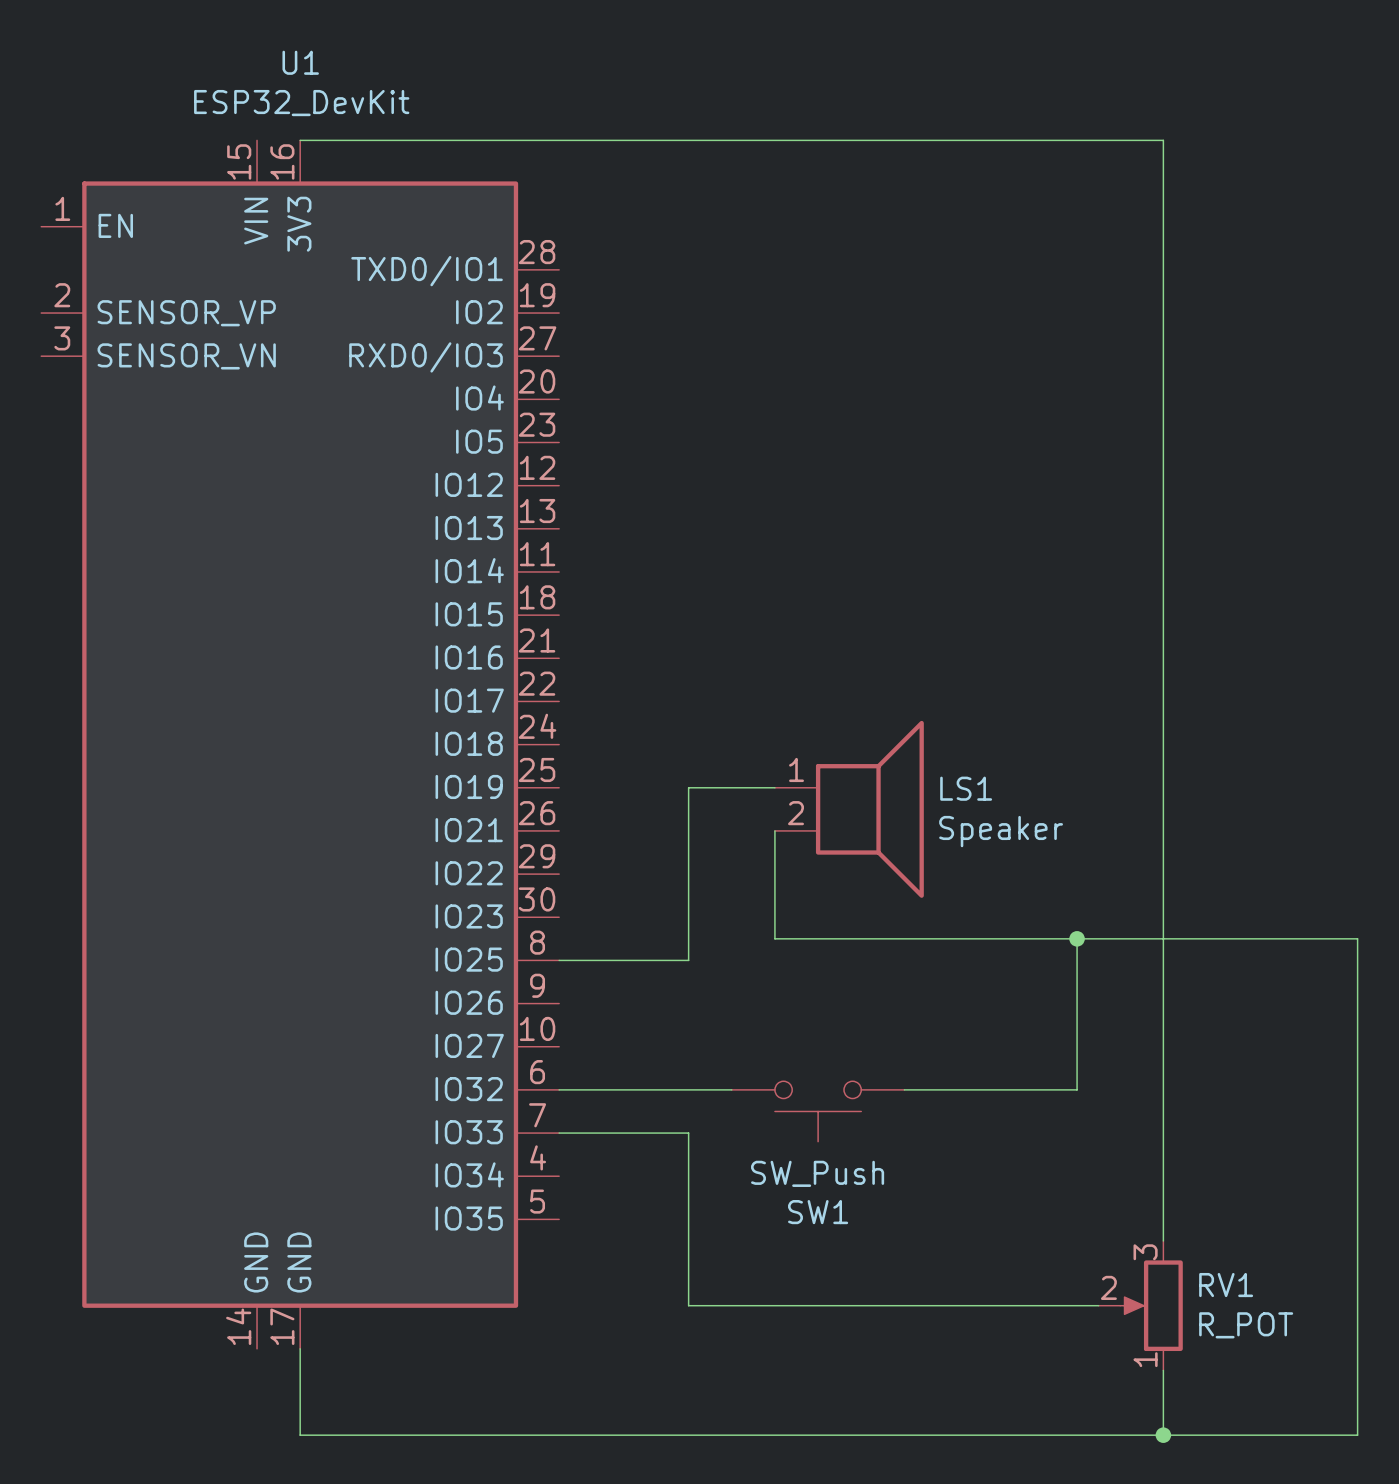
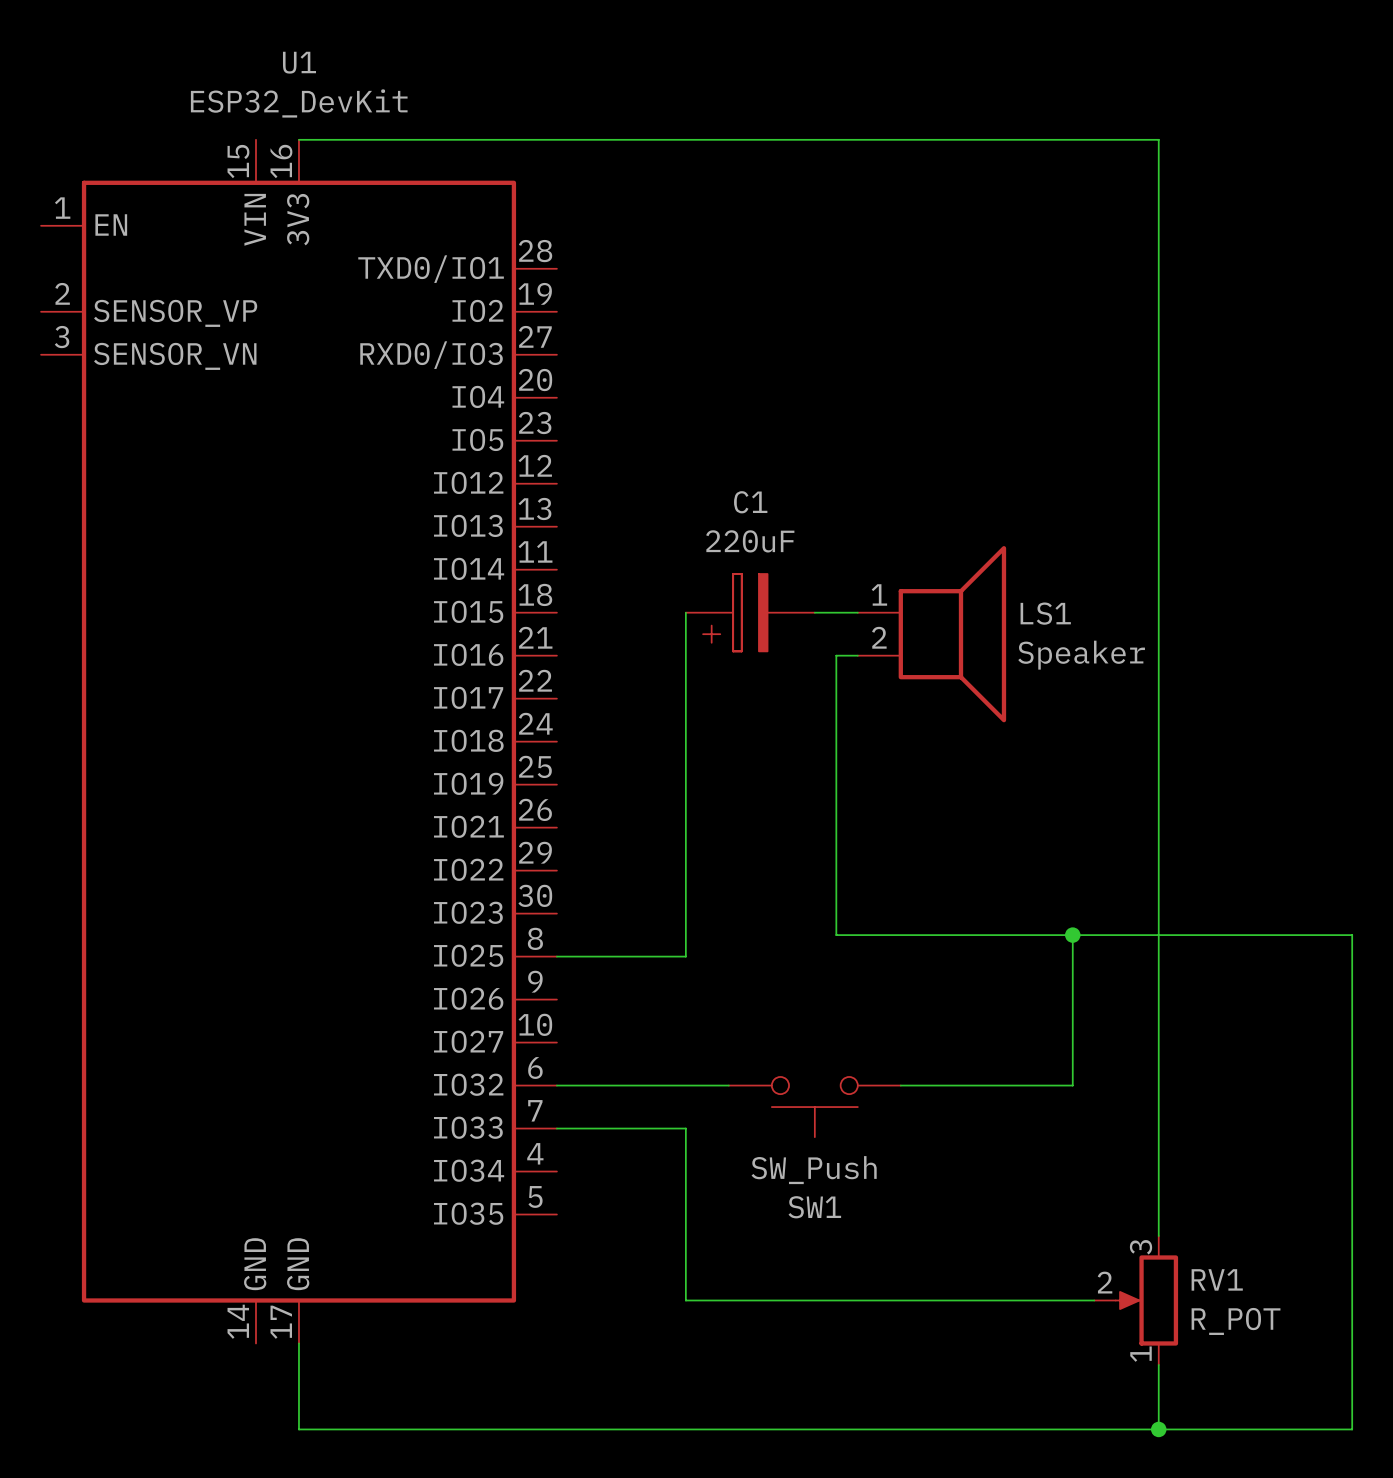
C1: none -> 220uF (750, 612)
wire: none -> (814, 612) (857, 612)
wire: (688, 787) (774, 787) -> (685, 784) (685, 612)
LS1 position: (849, 809) -> (931, 634)
wire: (774, 830) (774, 938) (839, 938) -> (857, 655) (836, 655) (836, 935)

